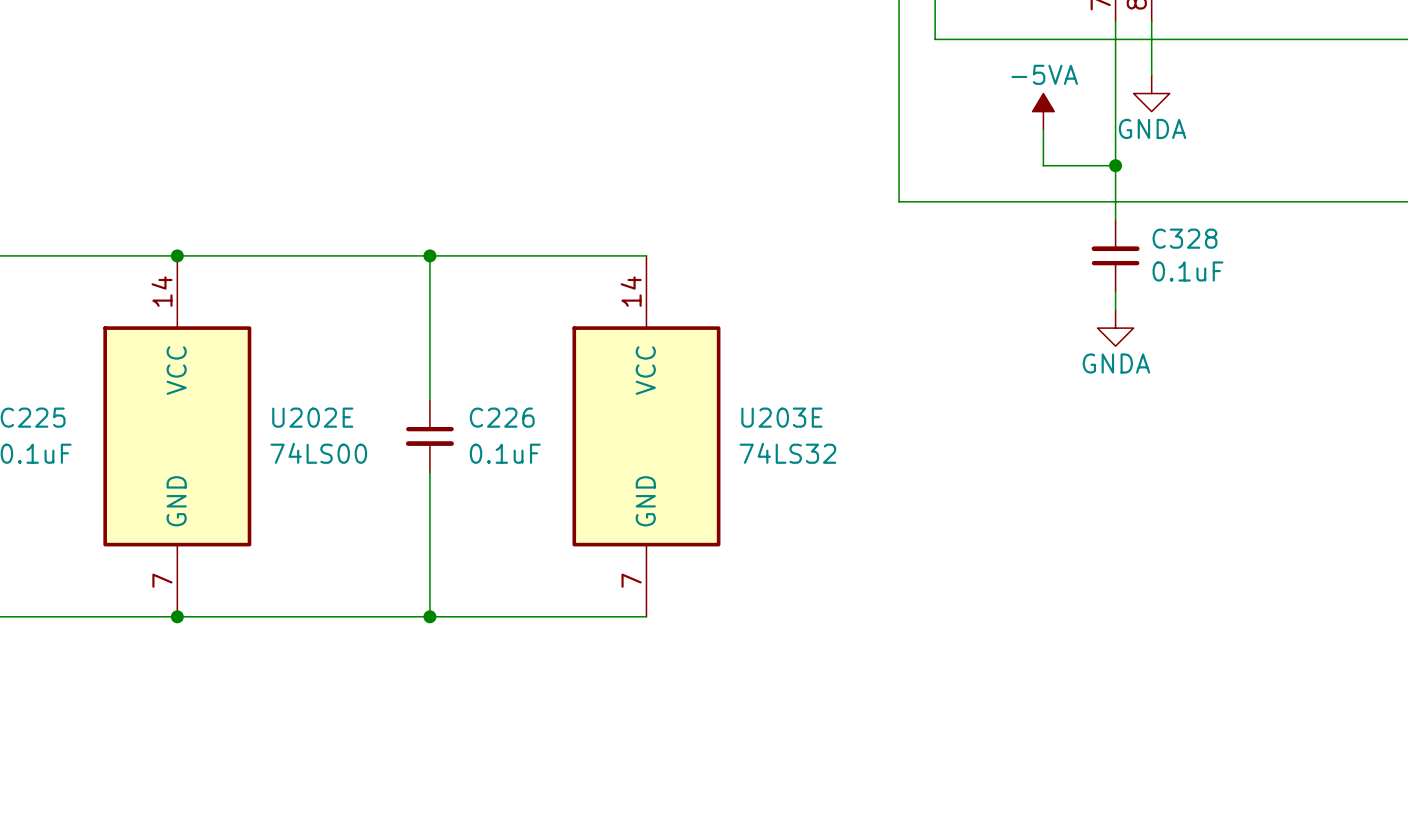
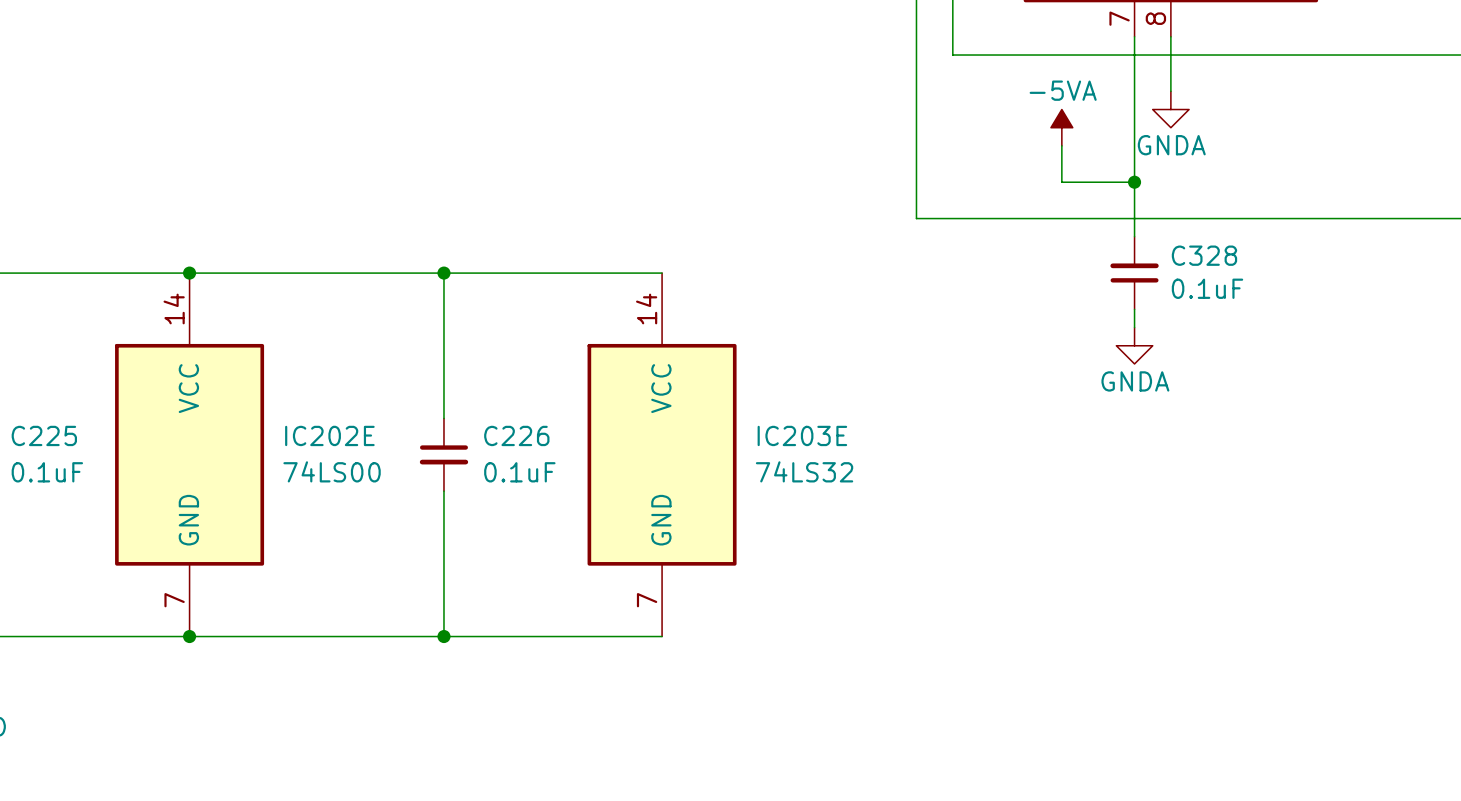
U202E name: U202E (312, 417) -> IC202E (329, 435)
U203E name: U203E (781, 417) -> IC203E (802, 435)

